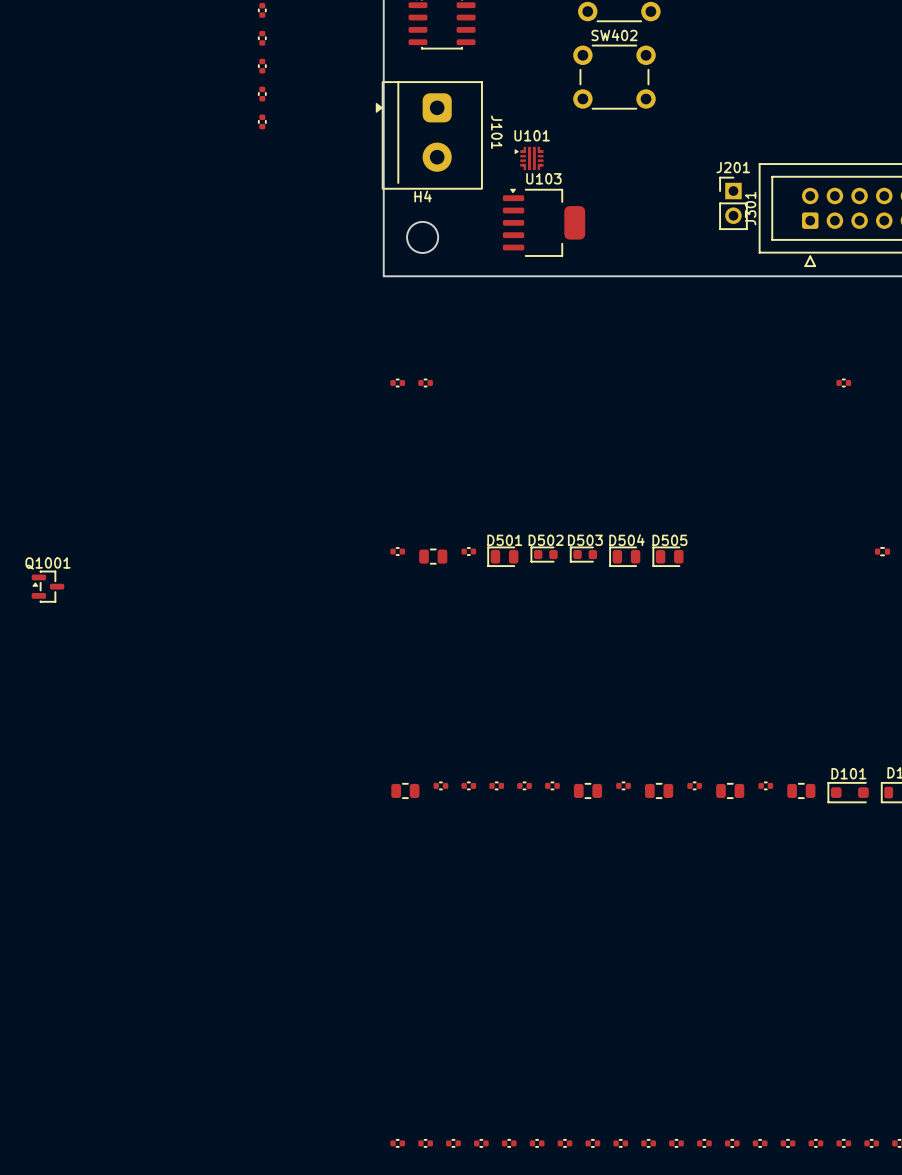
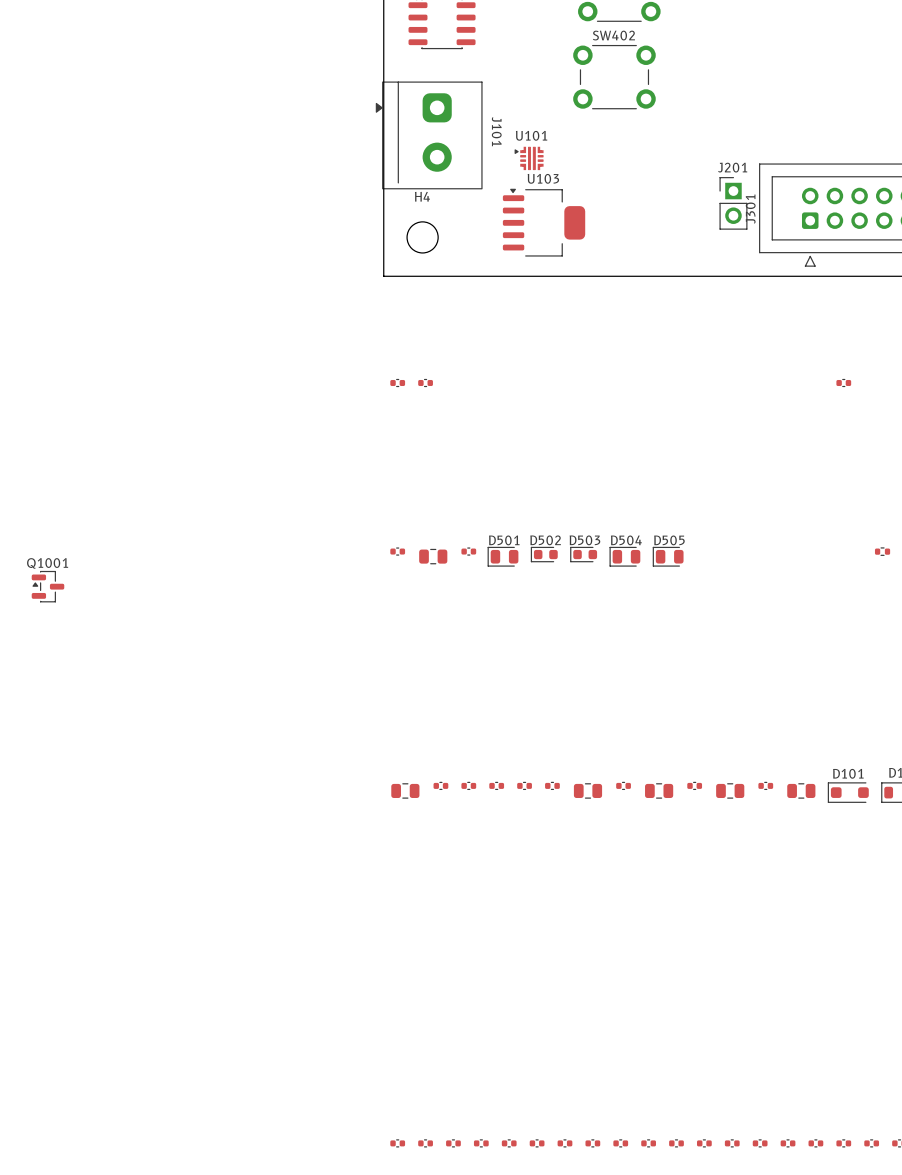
part: (262, 10) -> none
part: (262, 38) -> none
part: (262, 66) -> none
part: (262, 94) -> none
part: (262, 121) -> none

